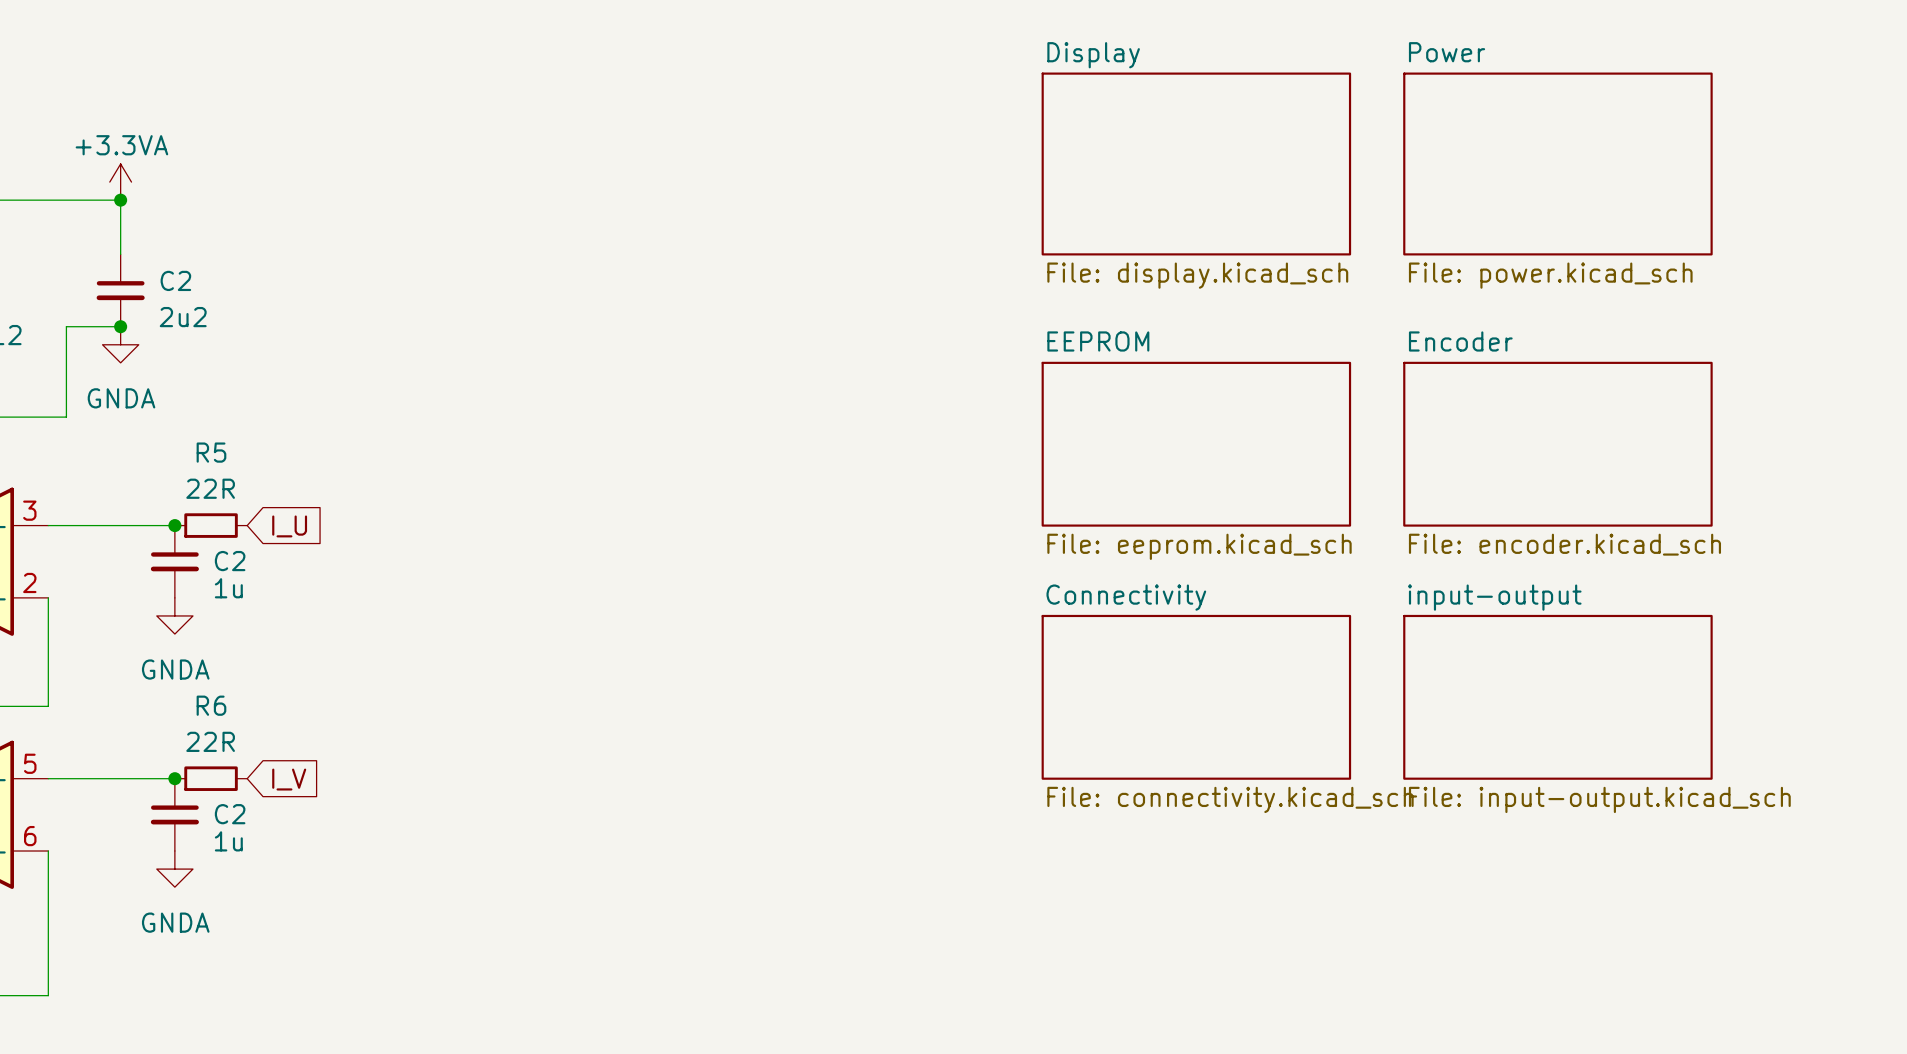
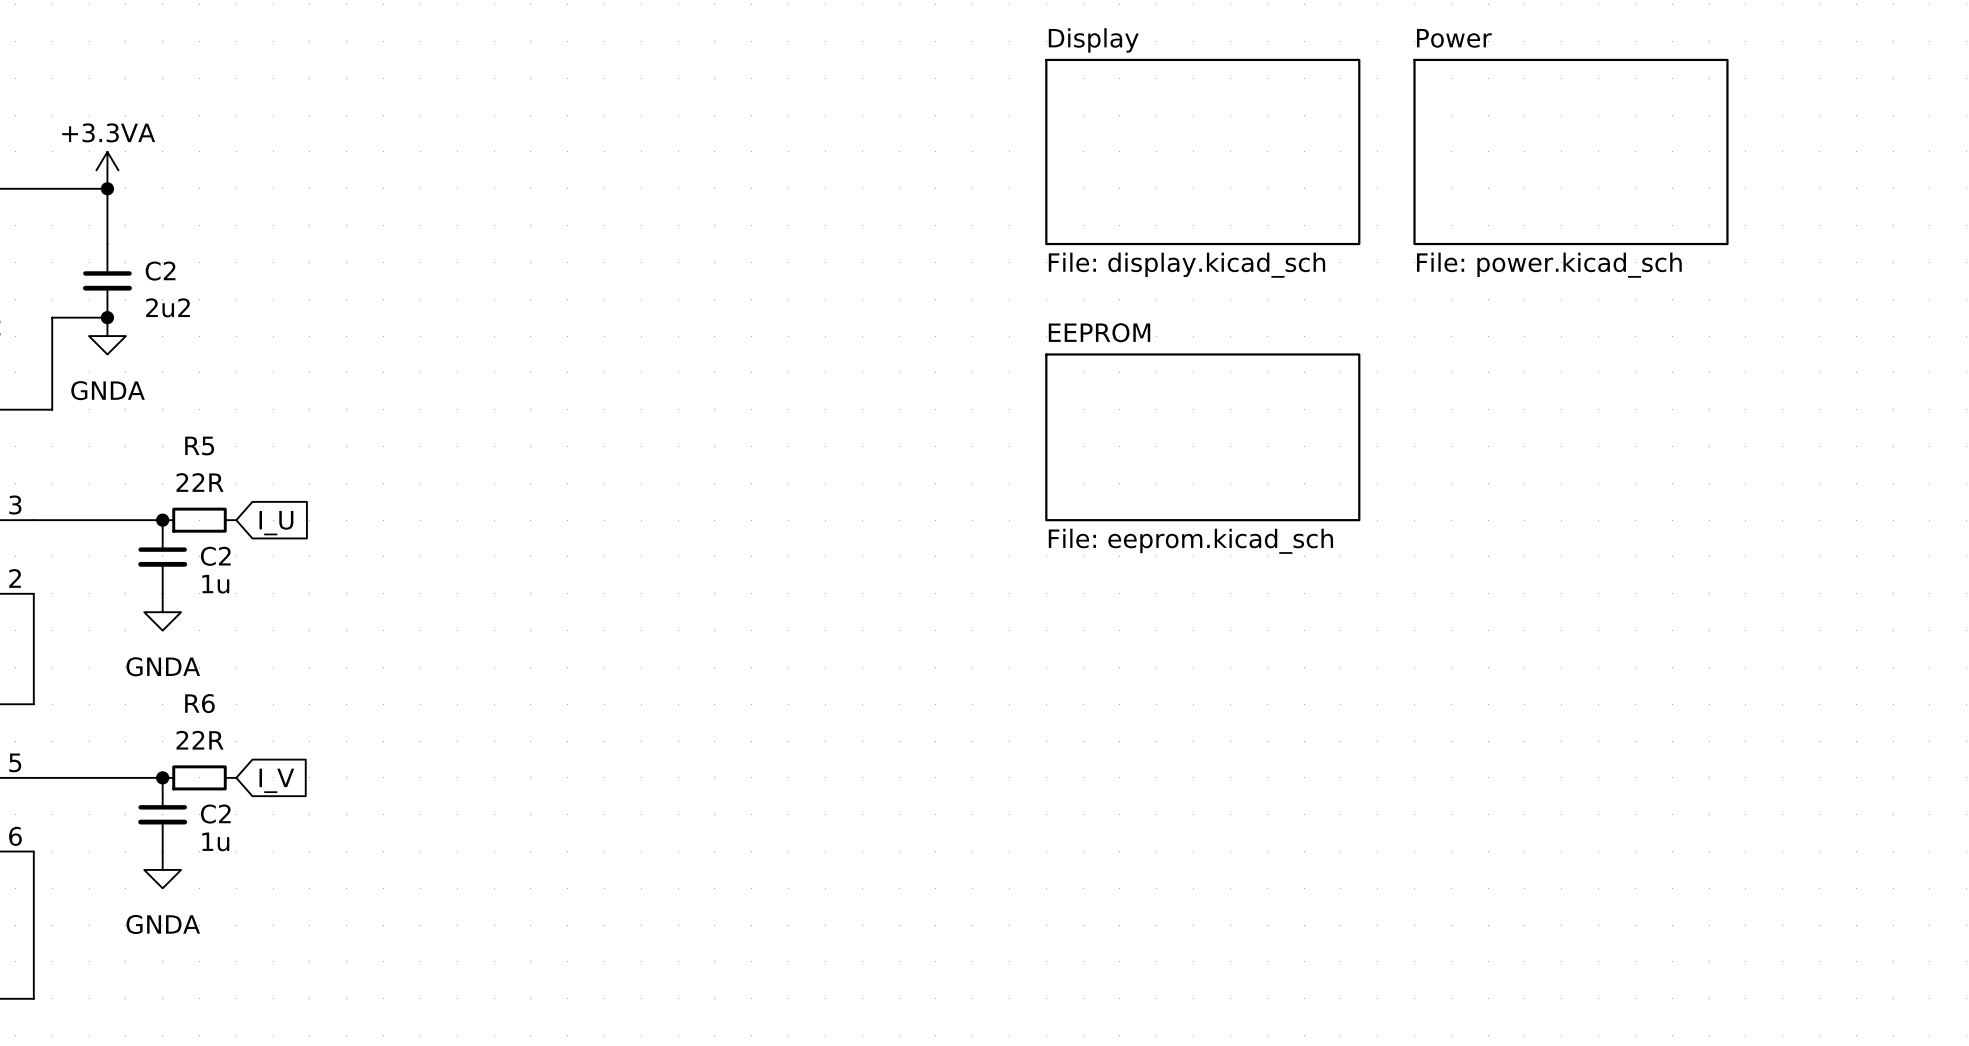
sheet Encoder: File: encoder.kicad_sch (1557, 444) -> none
sheet Connectivity: File: connectivity.kicad_sch (1196, 697) -> none
sheet input-output: File: input-output.kicad_sch (1557, 697) -> none

